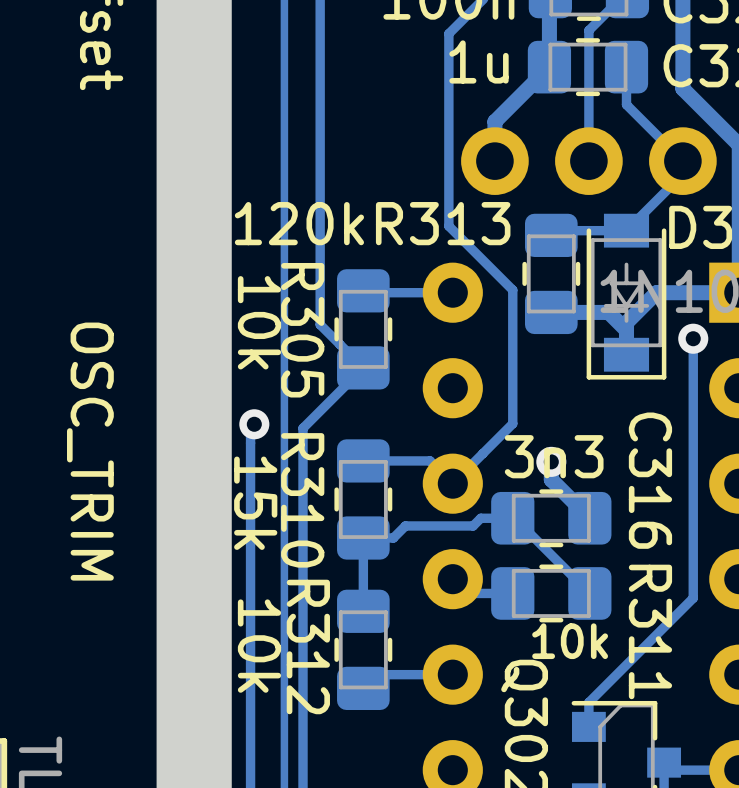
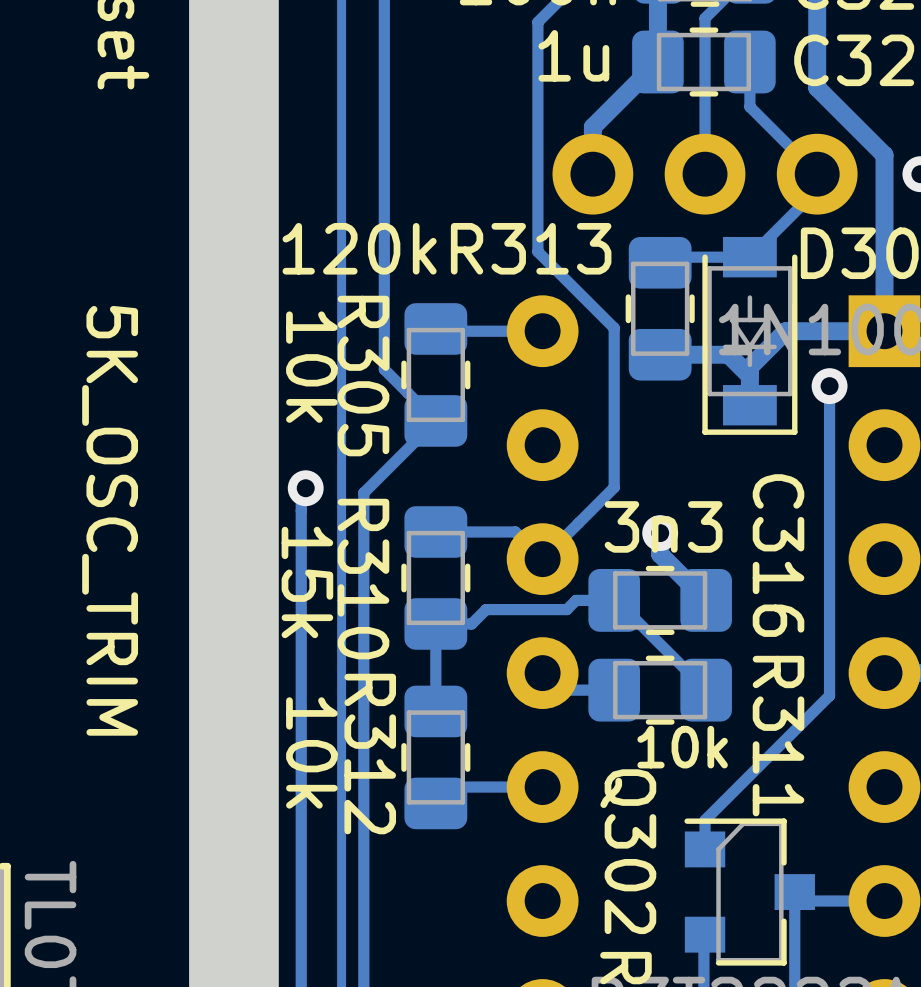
part value: OSC_TRIM (90, 451) -> 5K_OSC_TRIM (110, 520)

